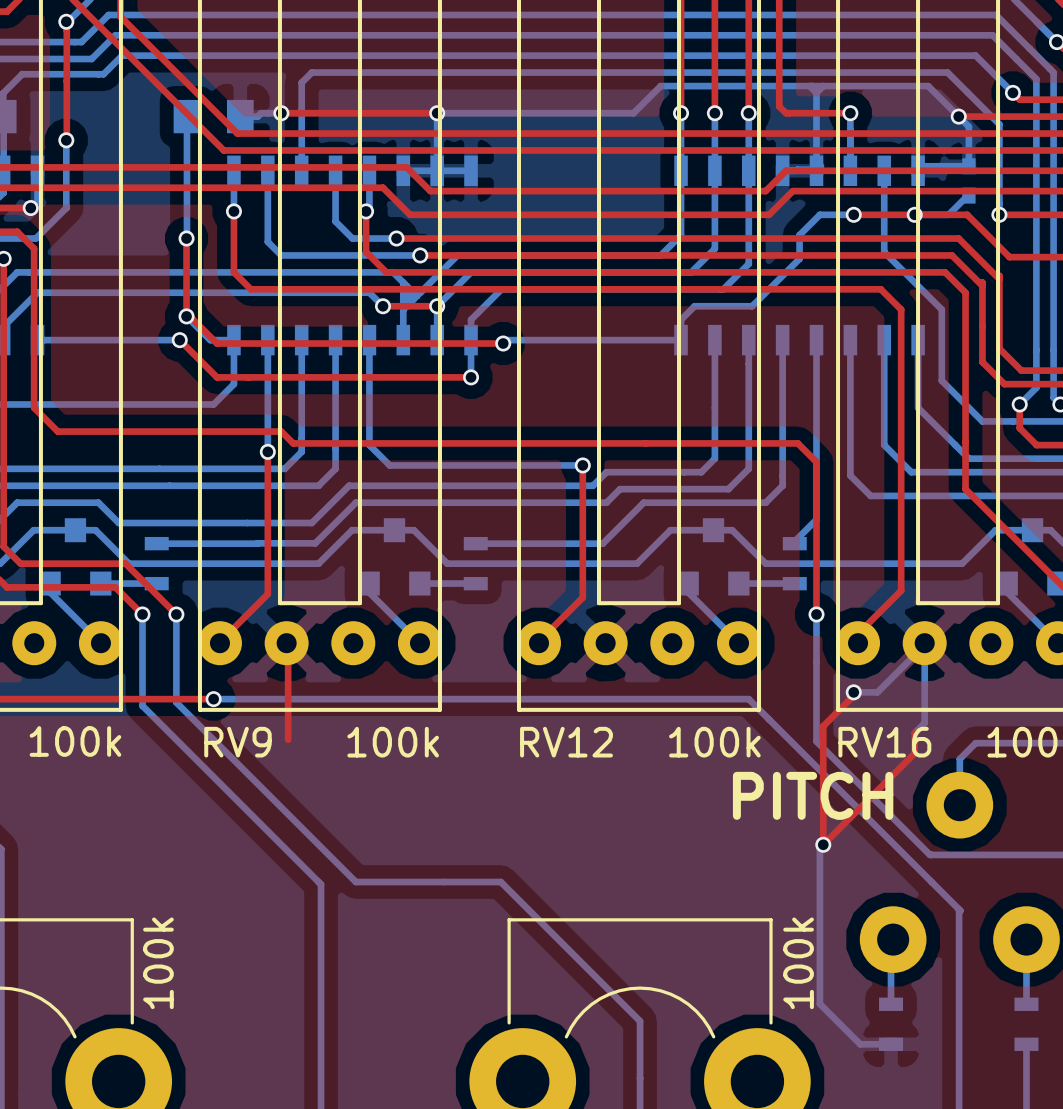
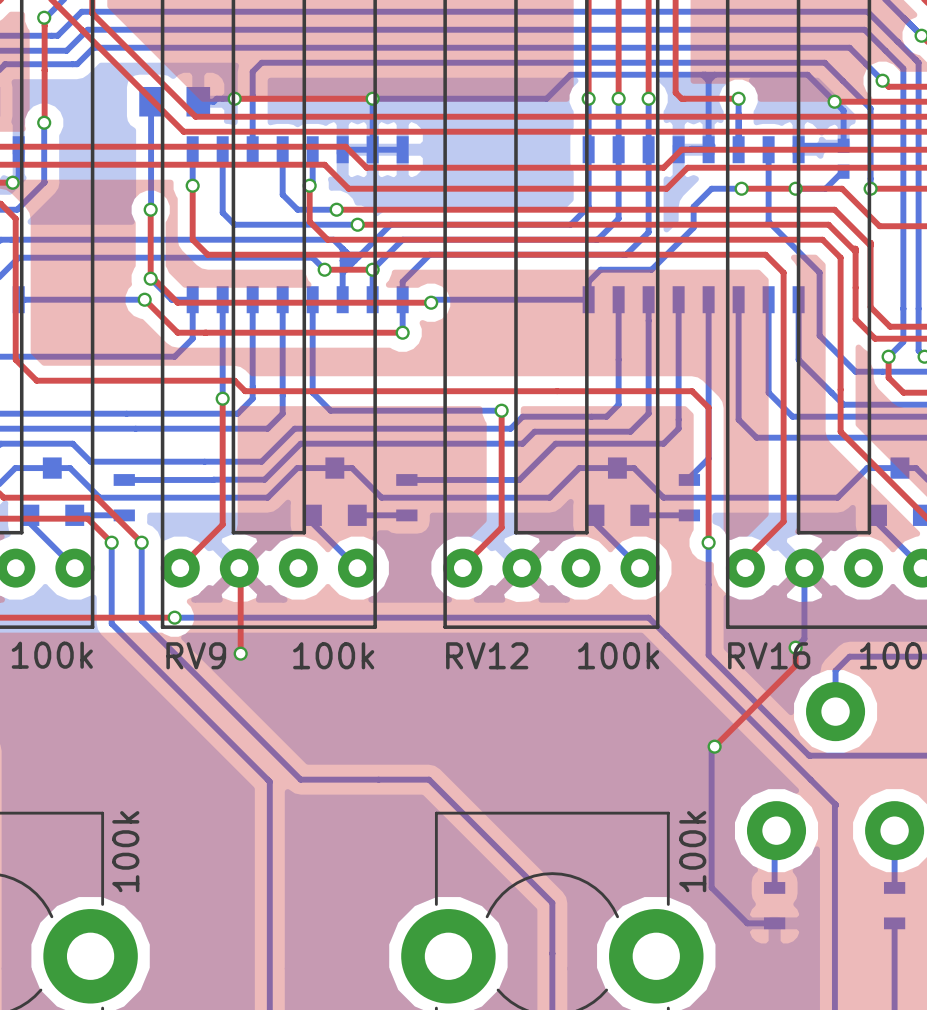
bottom track: (924, 645) (877, 692) (853, 692) -> none
top track: (853, 692) (853, 695) (823, 726) (823, 844) -> none
via position: (853, 692) -> (795, 647)
via: none -> (240, 653)
text: PITCH (813, 795) -> none

